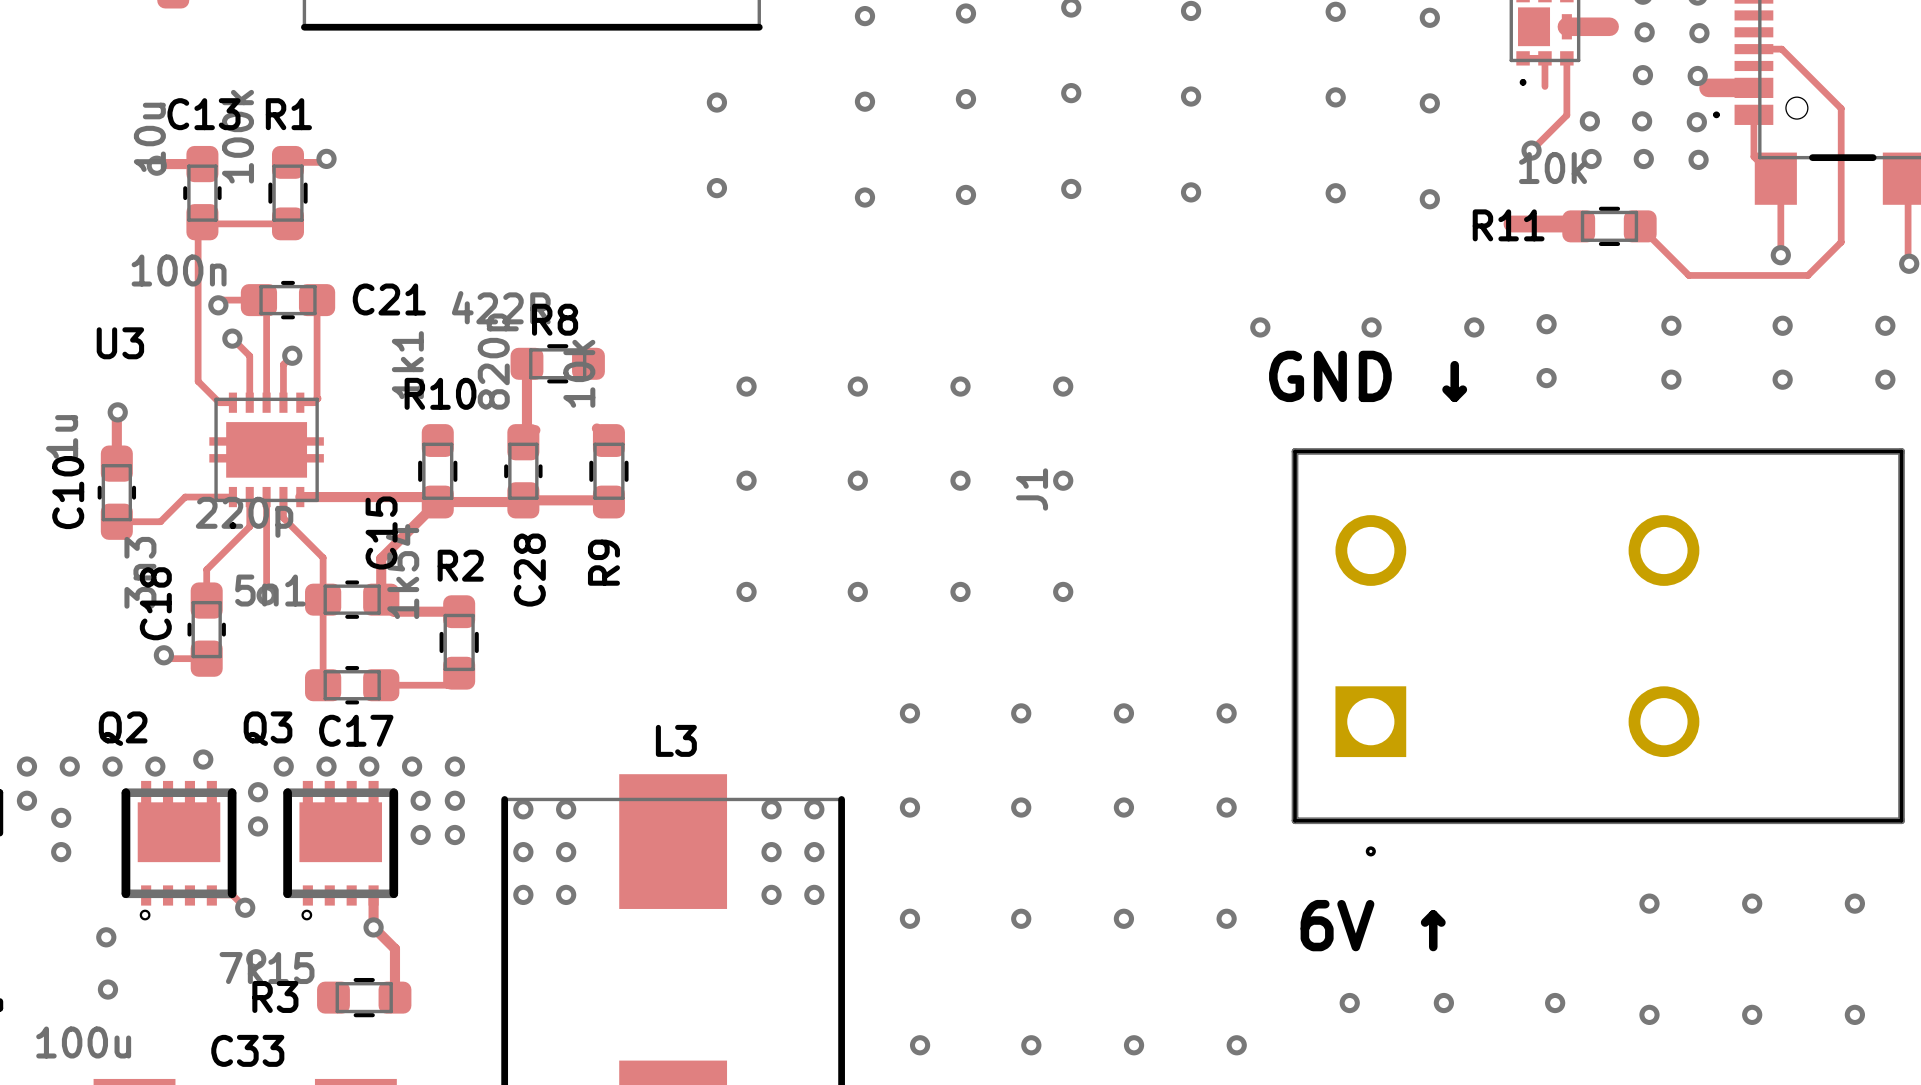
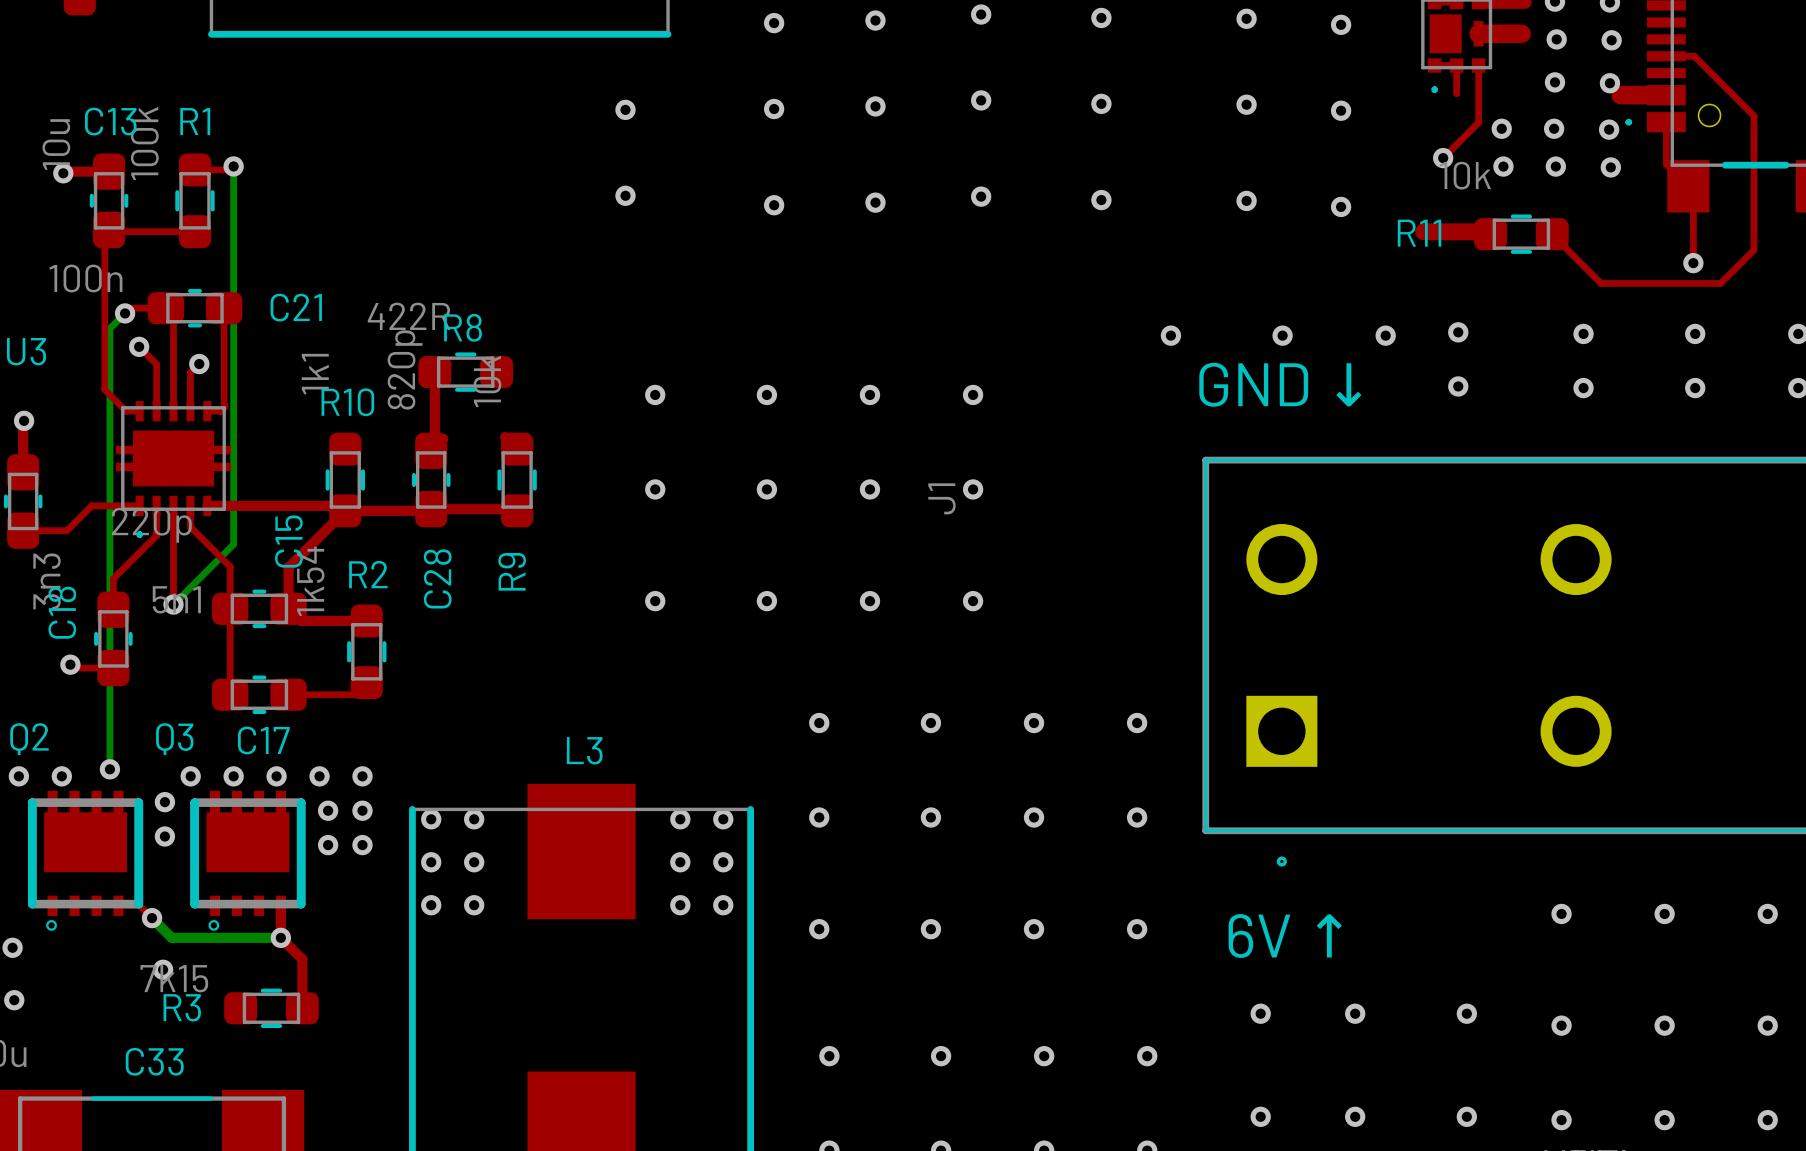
bottom track: none -> (233, 166) (233, 544) (173, 604)
bottom track: none -> (125, 313) (109, 328) (109, 769)
bottom track: none -> (152, 918) (171, 937) (280, 937)

